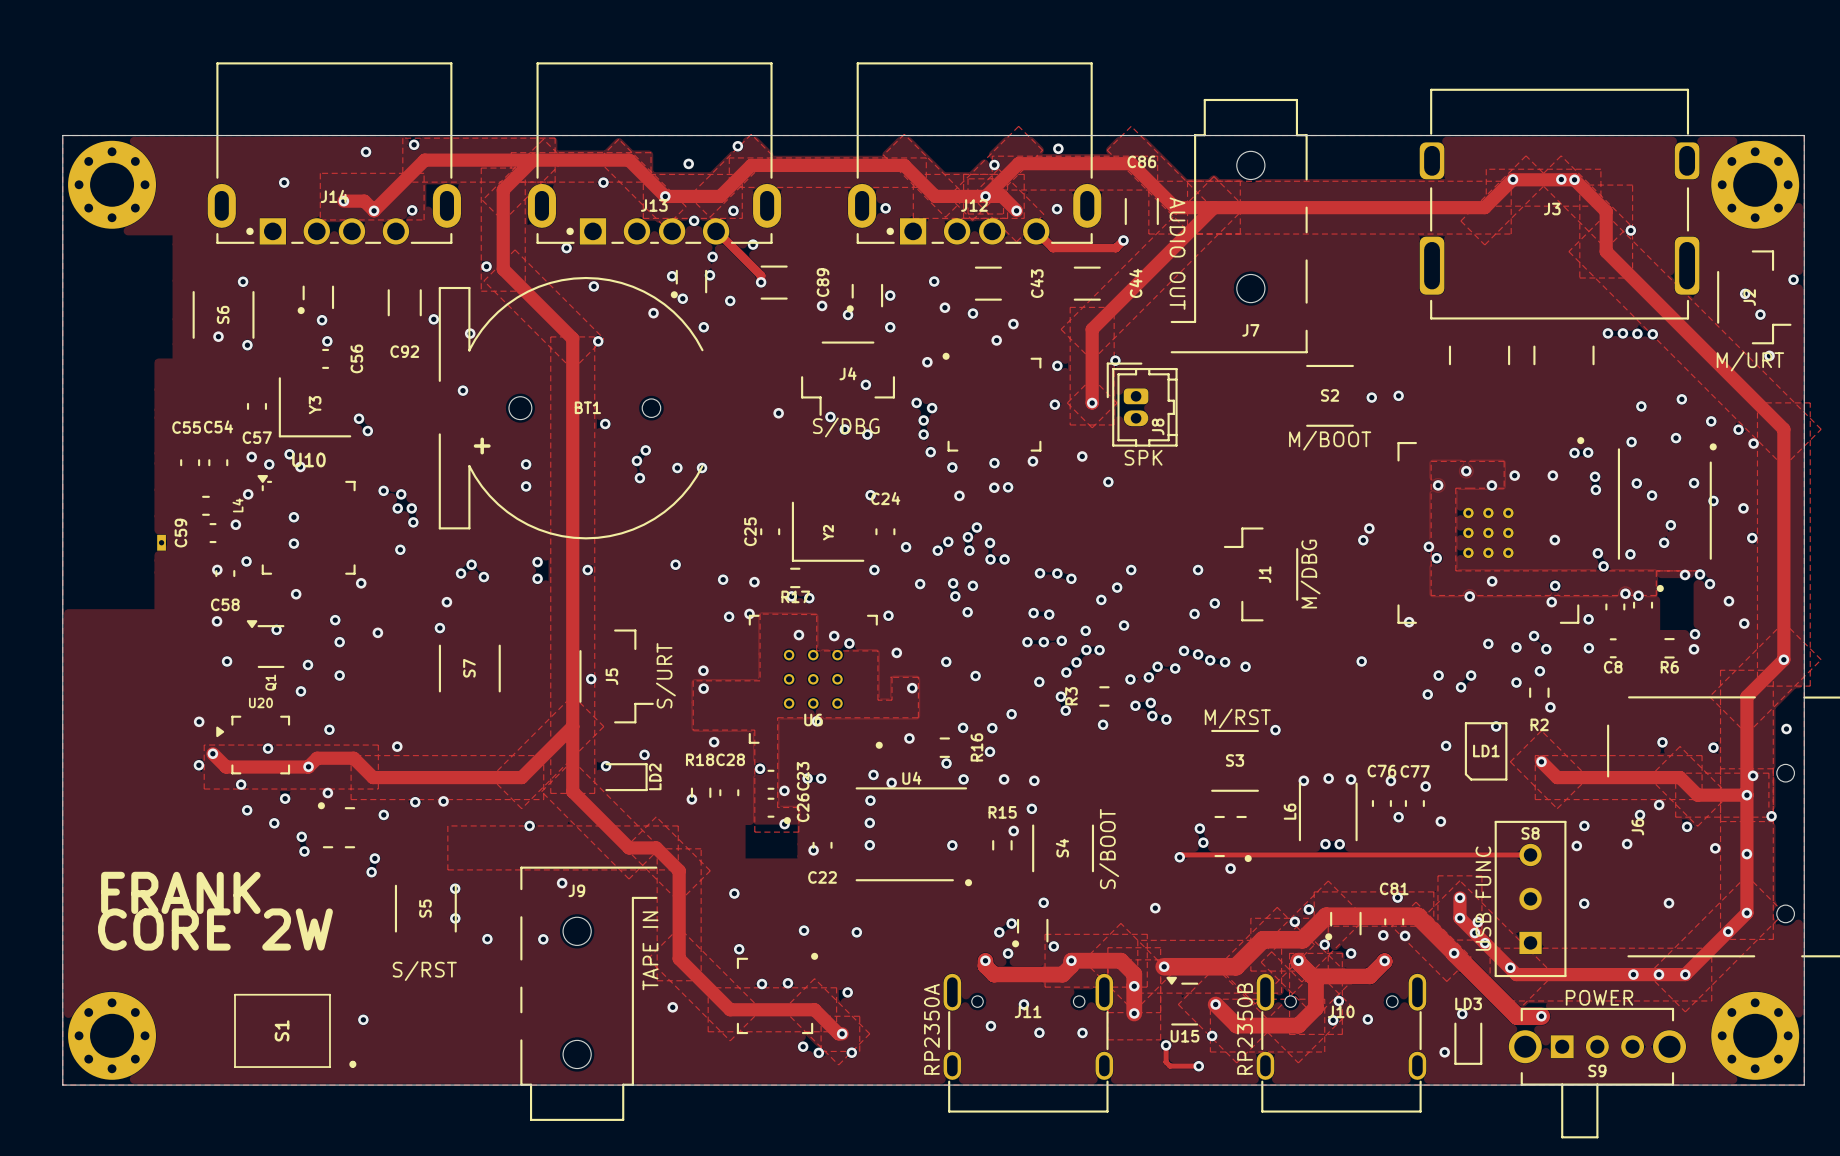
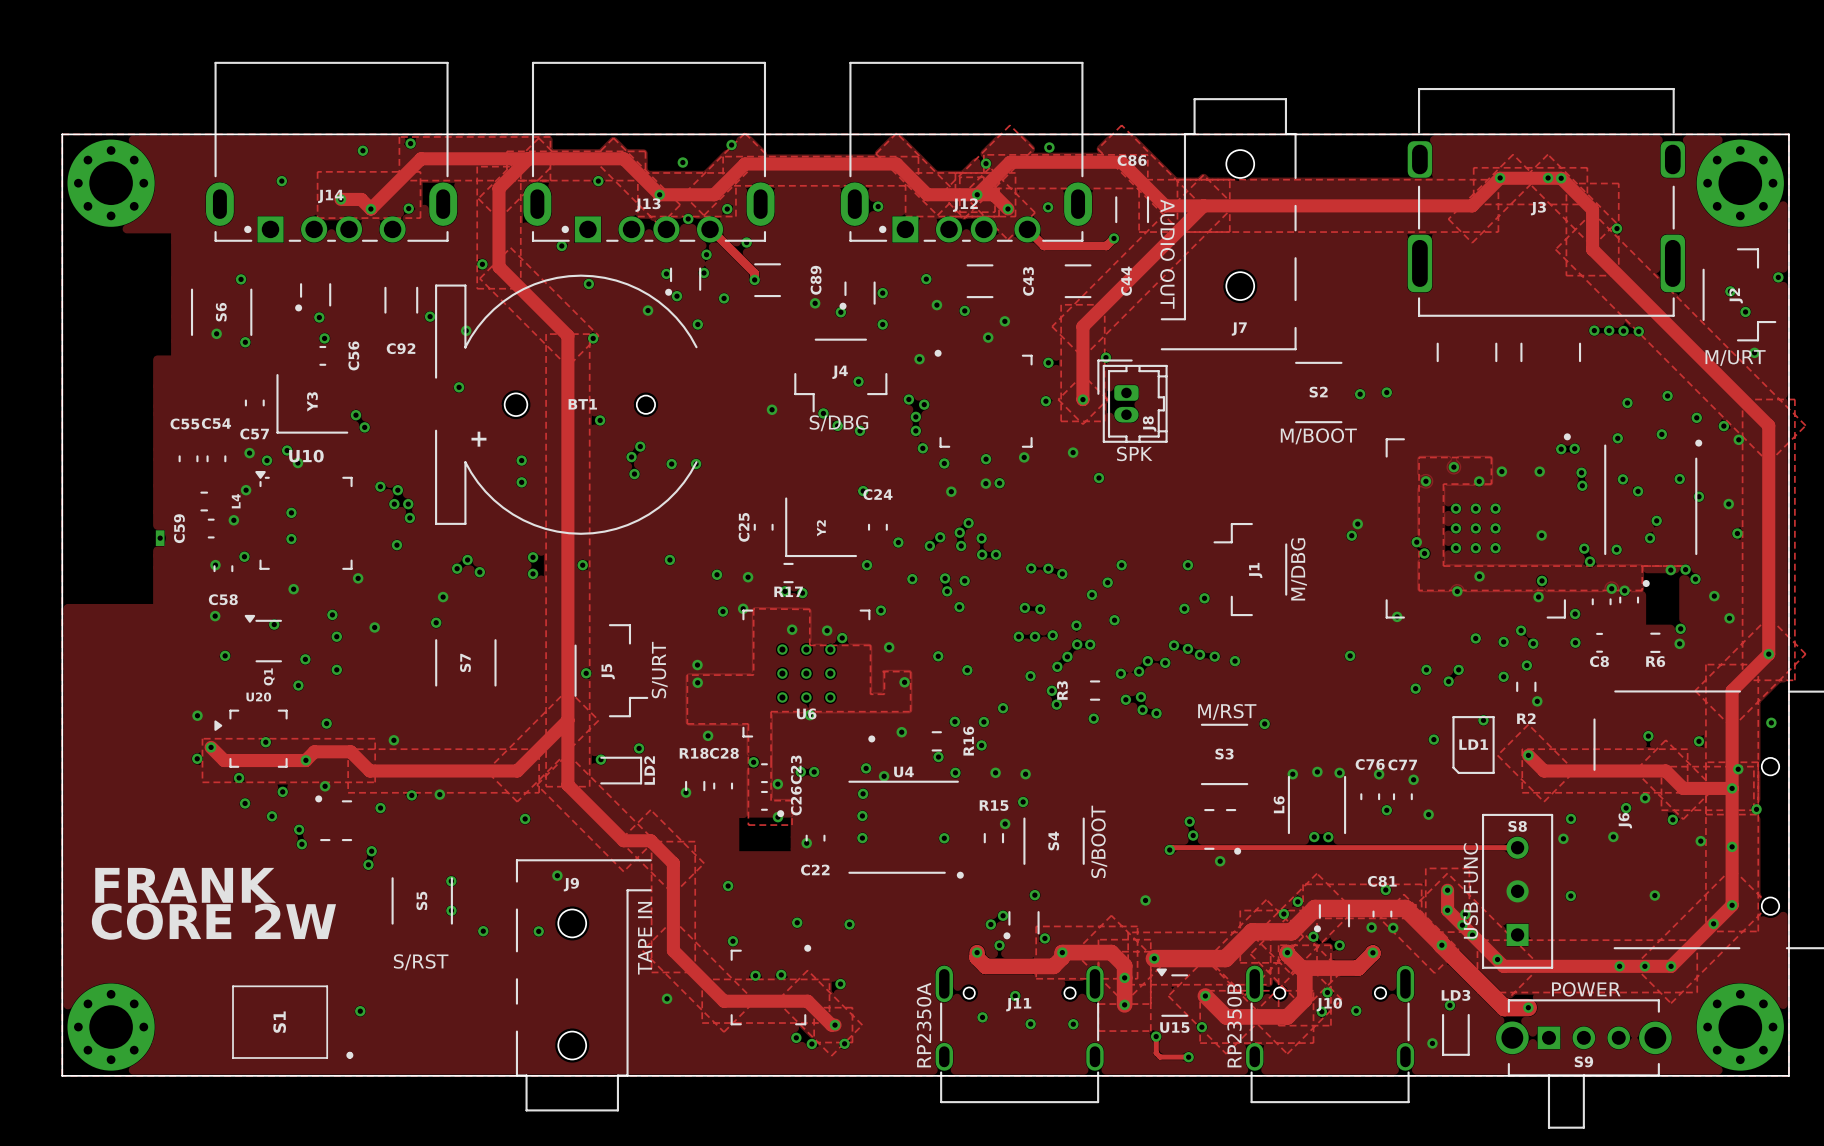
zone outline: (447, 825) (678, 825) (678, 869) (447, 869) (447, 825) -> none

